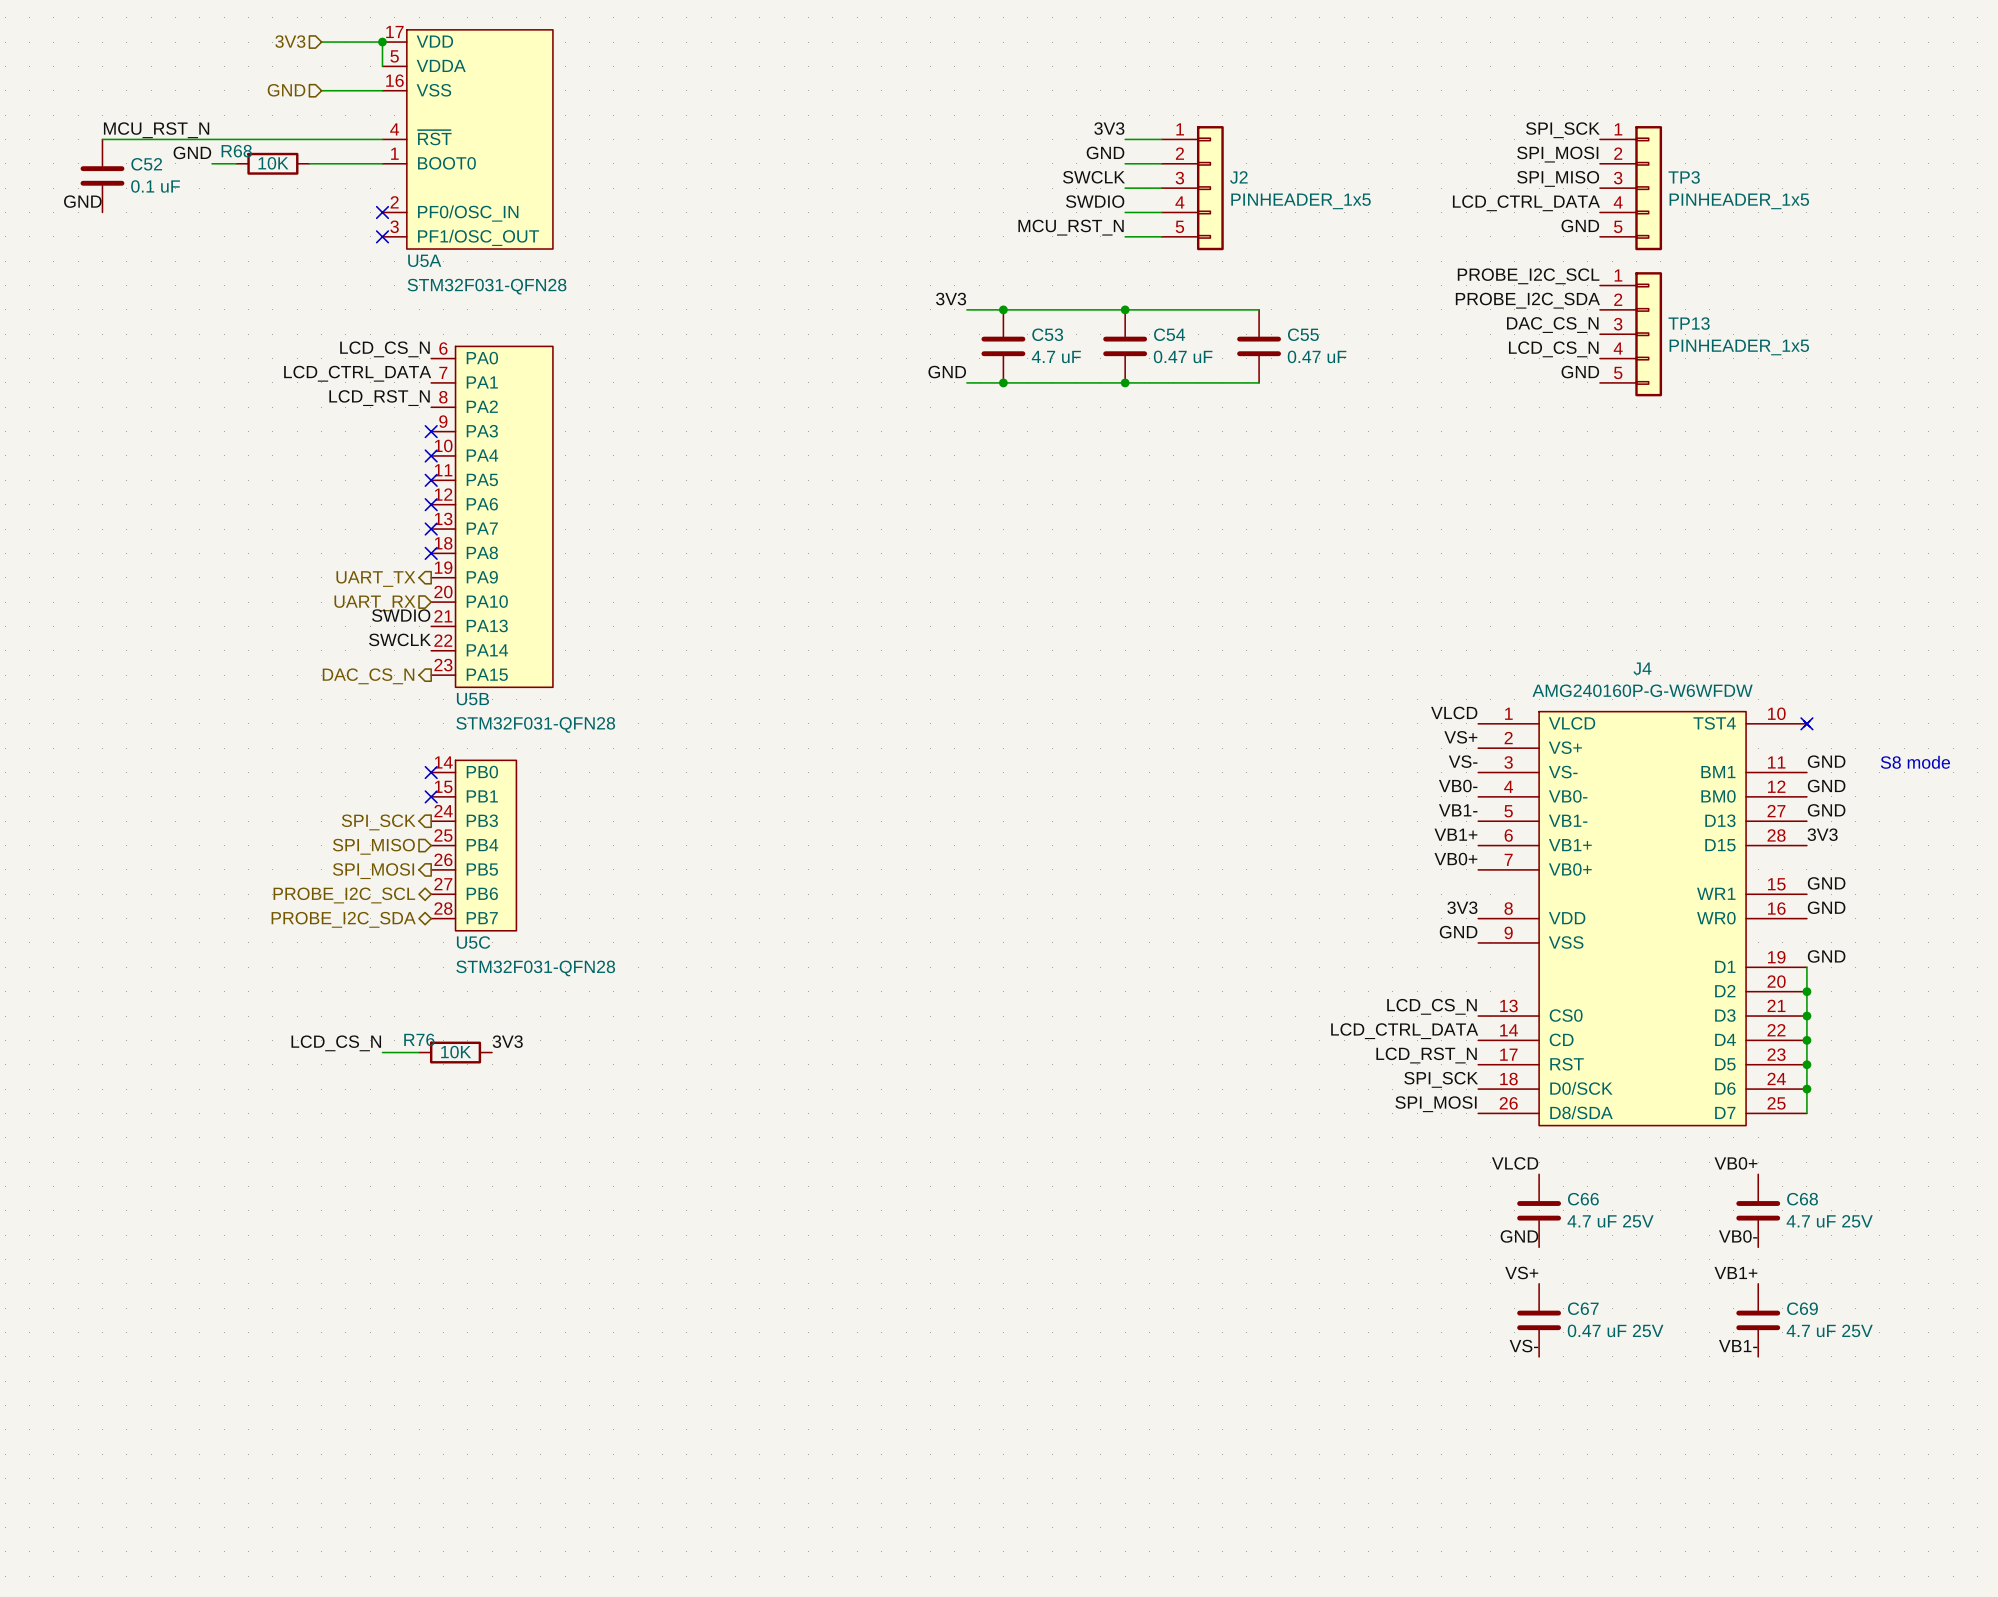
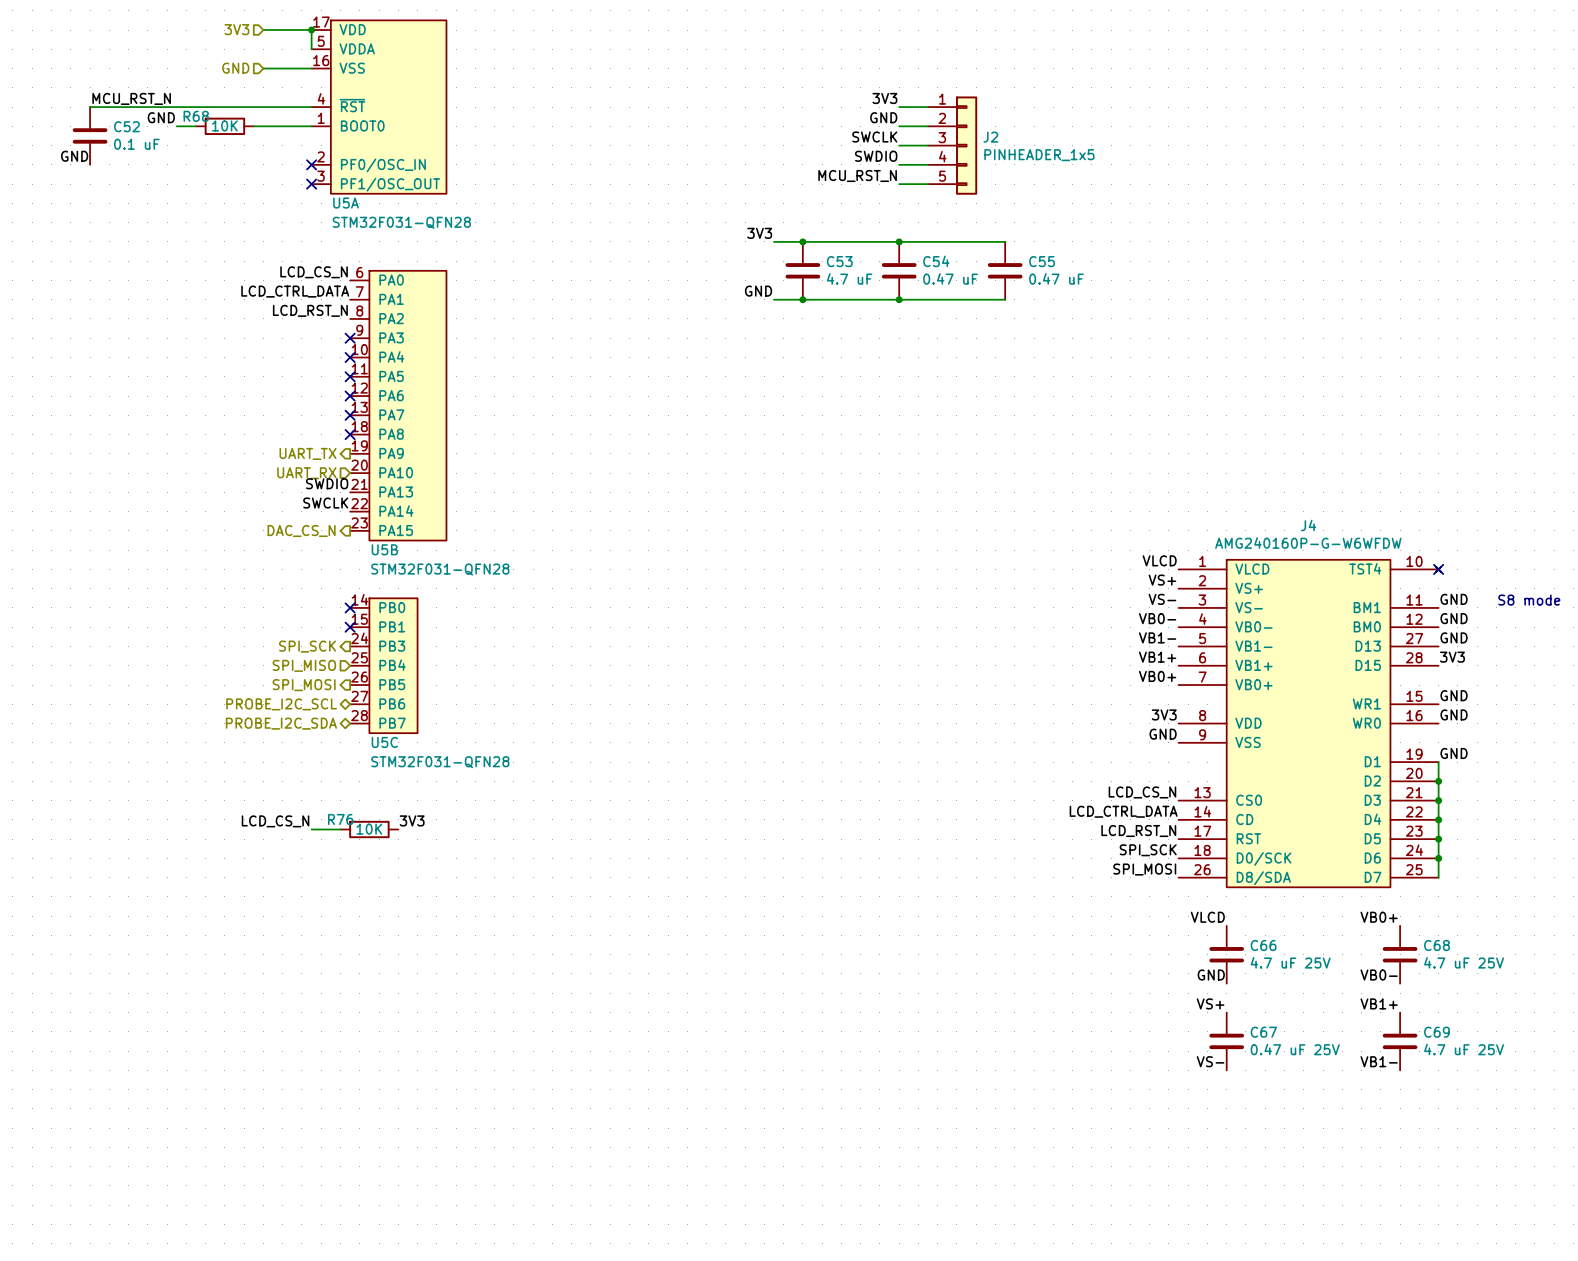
label: SPI_SCK (1562, 130) -> none
label: SPI_MOSI (1557, 154) -> none
label: SPI_MISO (1558, 178) -> none
TP3: PINHEADER_1x5 (1631, 188) -> none
label: LCD_CTRL_DATA (1526, 203) -> none
label: GND (1580, 225) -> none
label: PROBE_I2C_SCL (1528, 276) -> none
label: PROBE_I2C_SDA (1527, 300) -> none
label: DAC_CS_N (1552, 325) -> none
TP13: PINHEADER_1x5 (1631, 334) -> none
label: LCD_CS_N (1553, 349) -> none
label: GND (1580, 372) -> none

